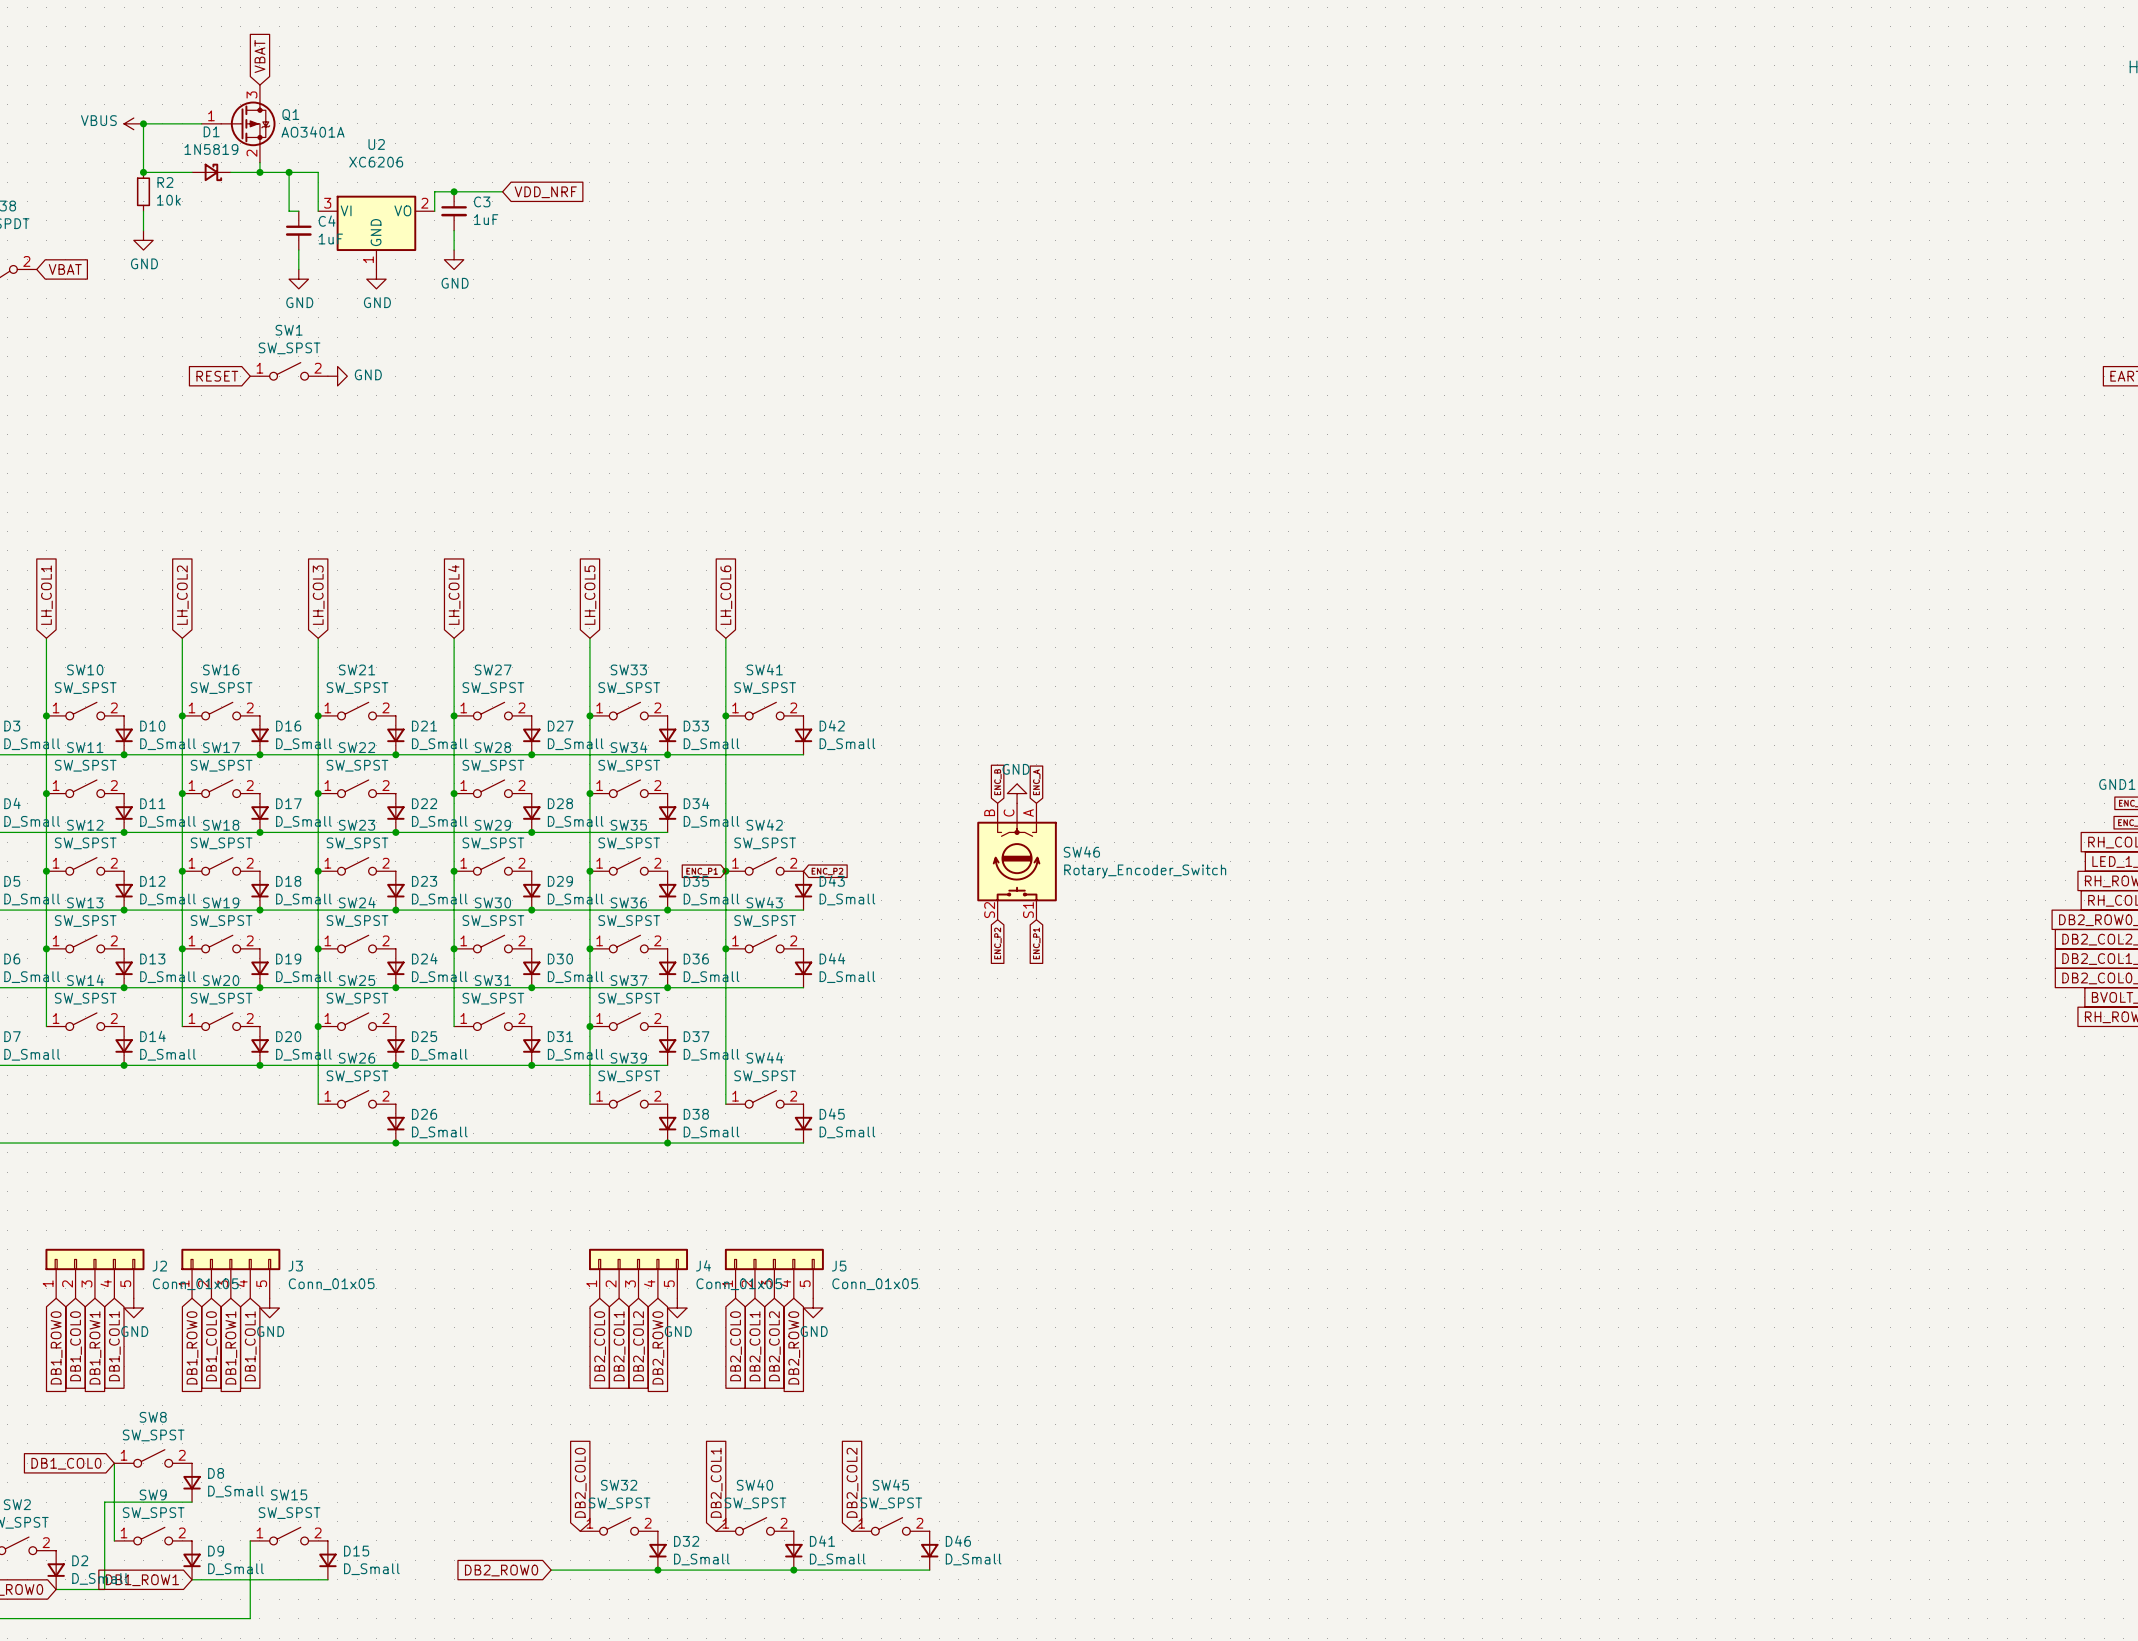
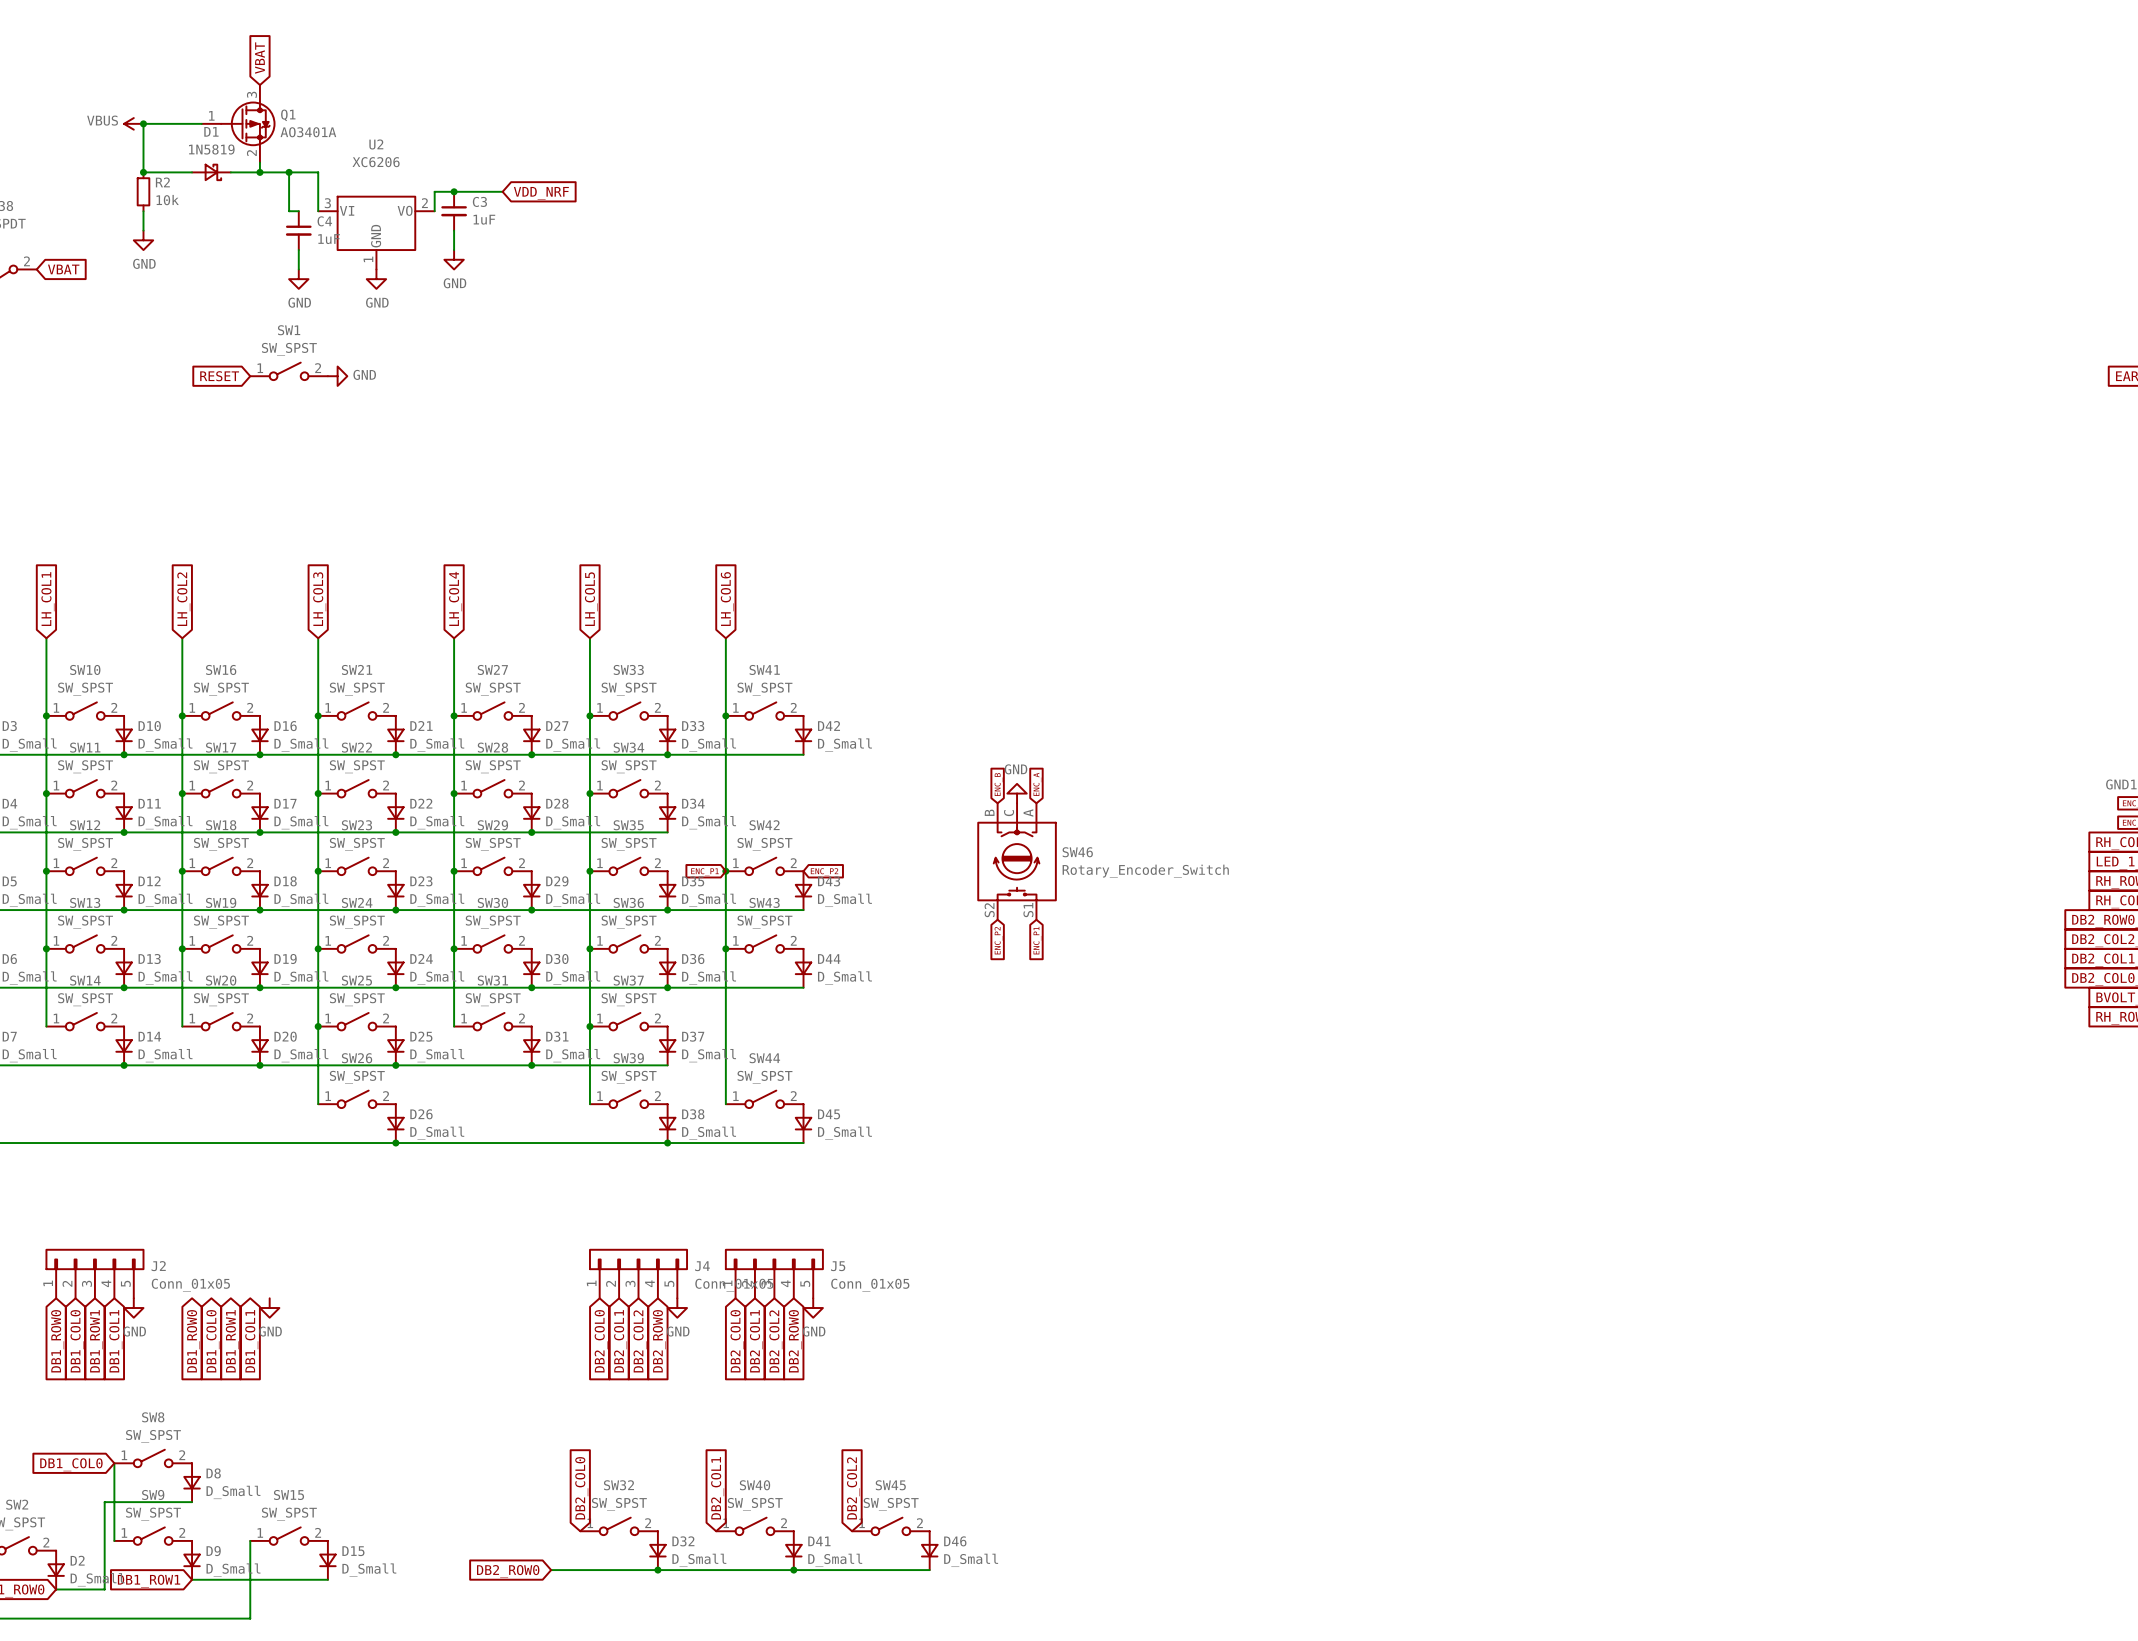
J3: Conn_01x05 (230, 1273) -> none

